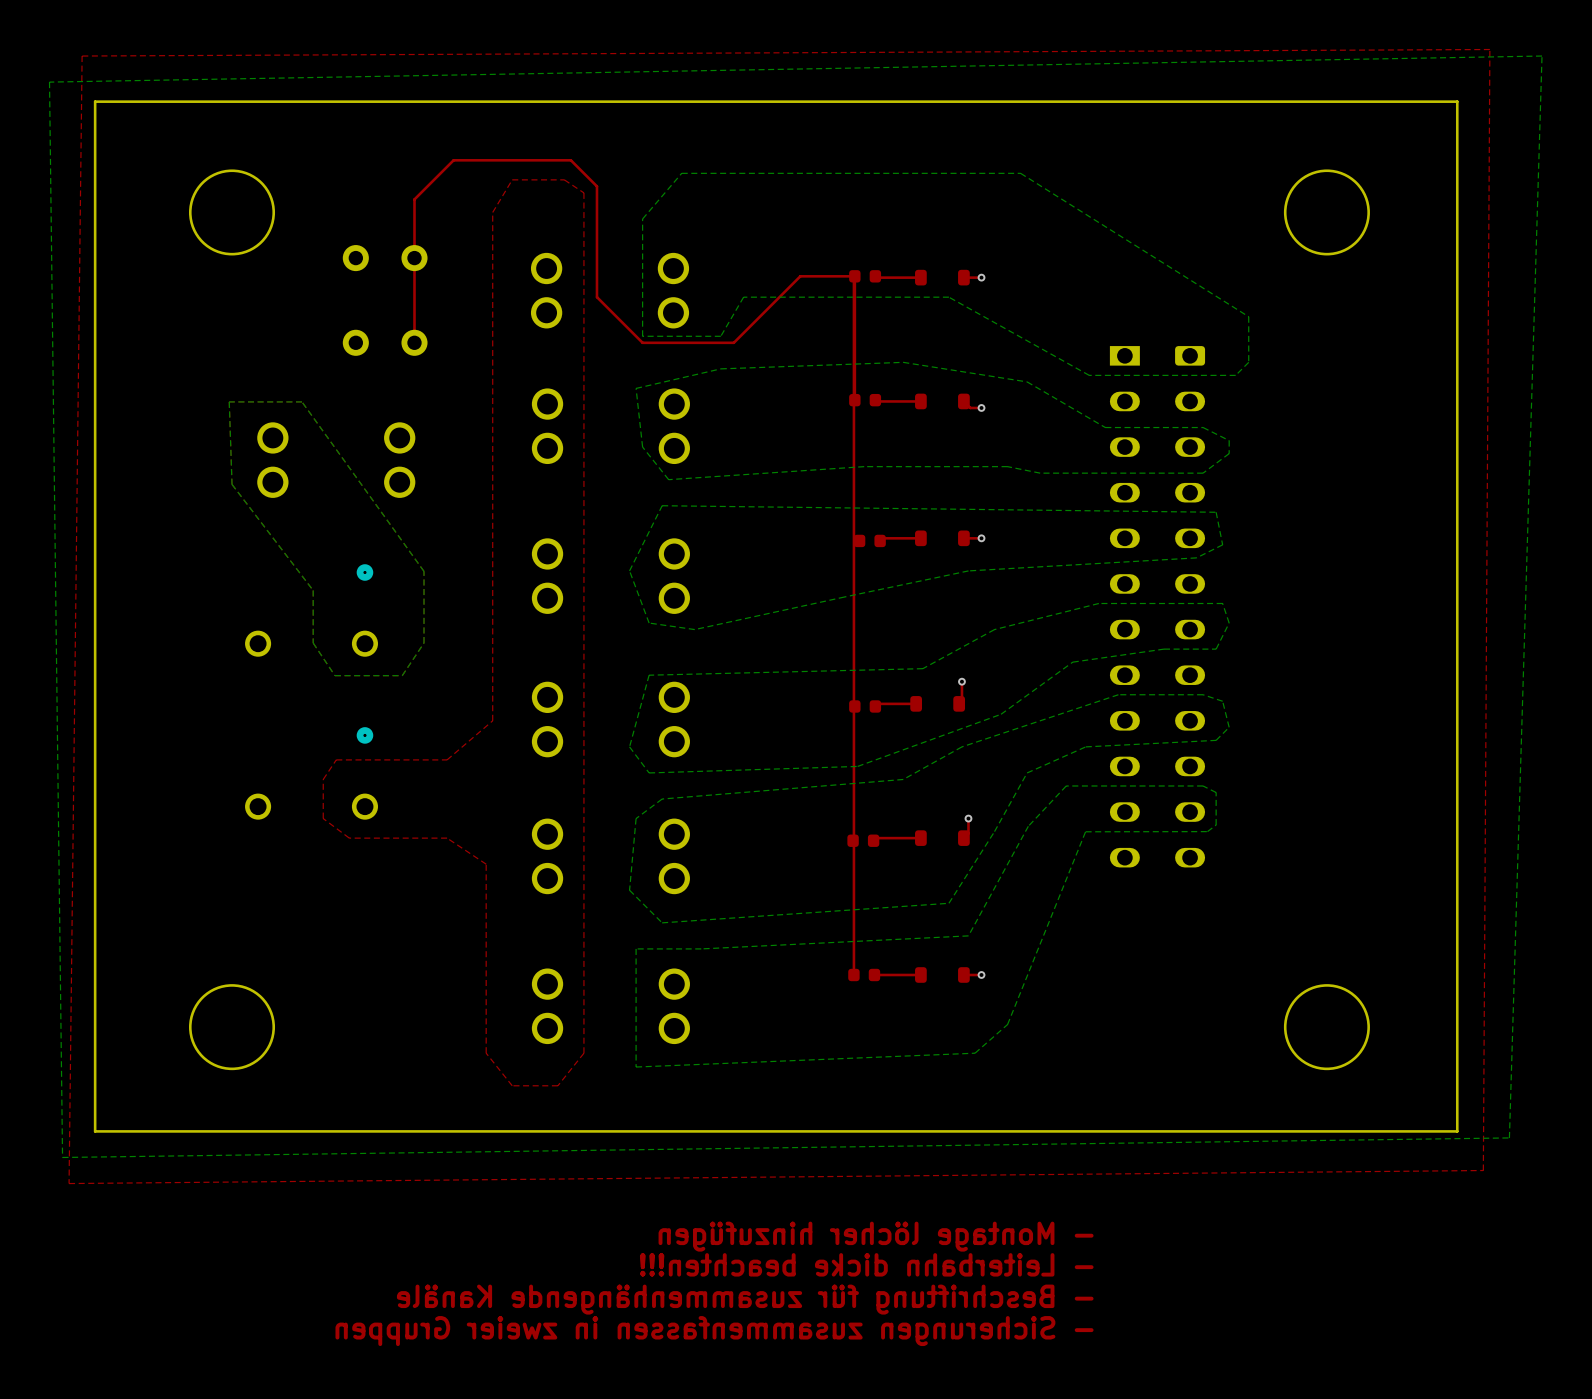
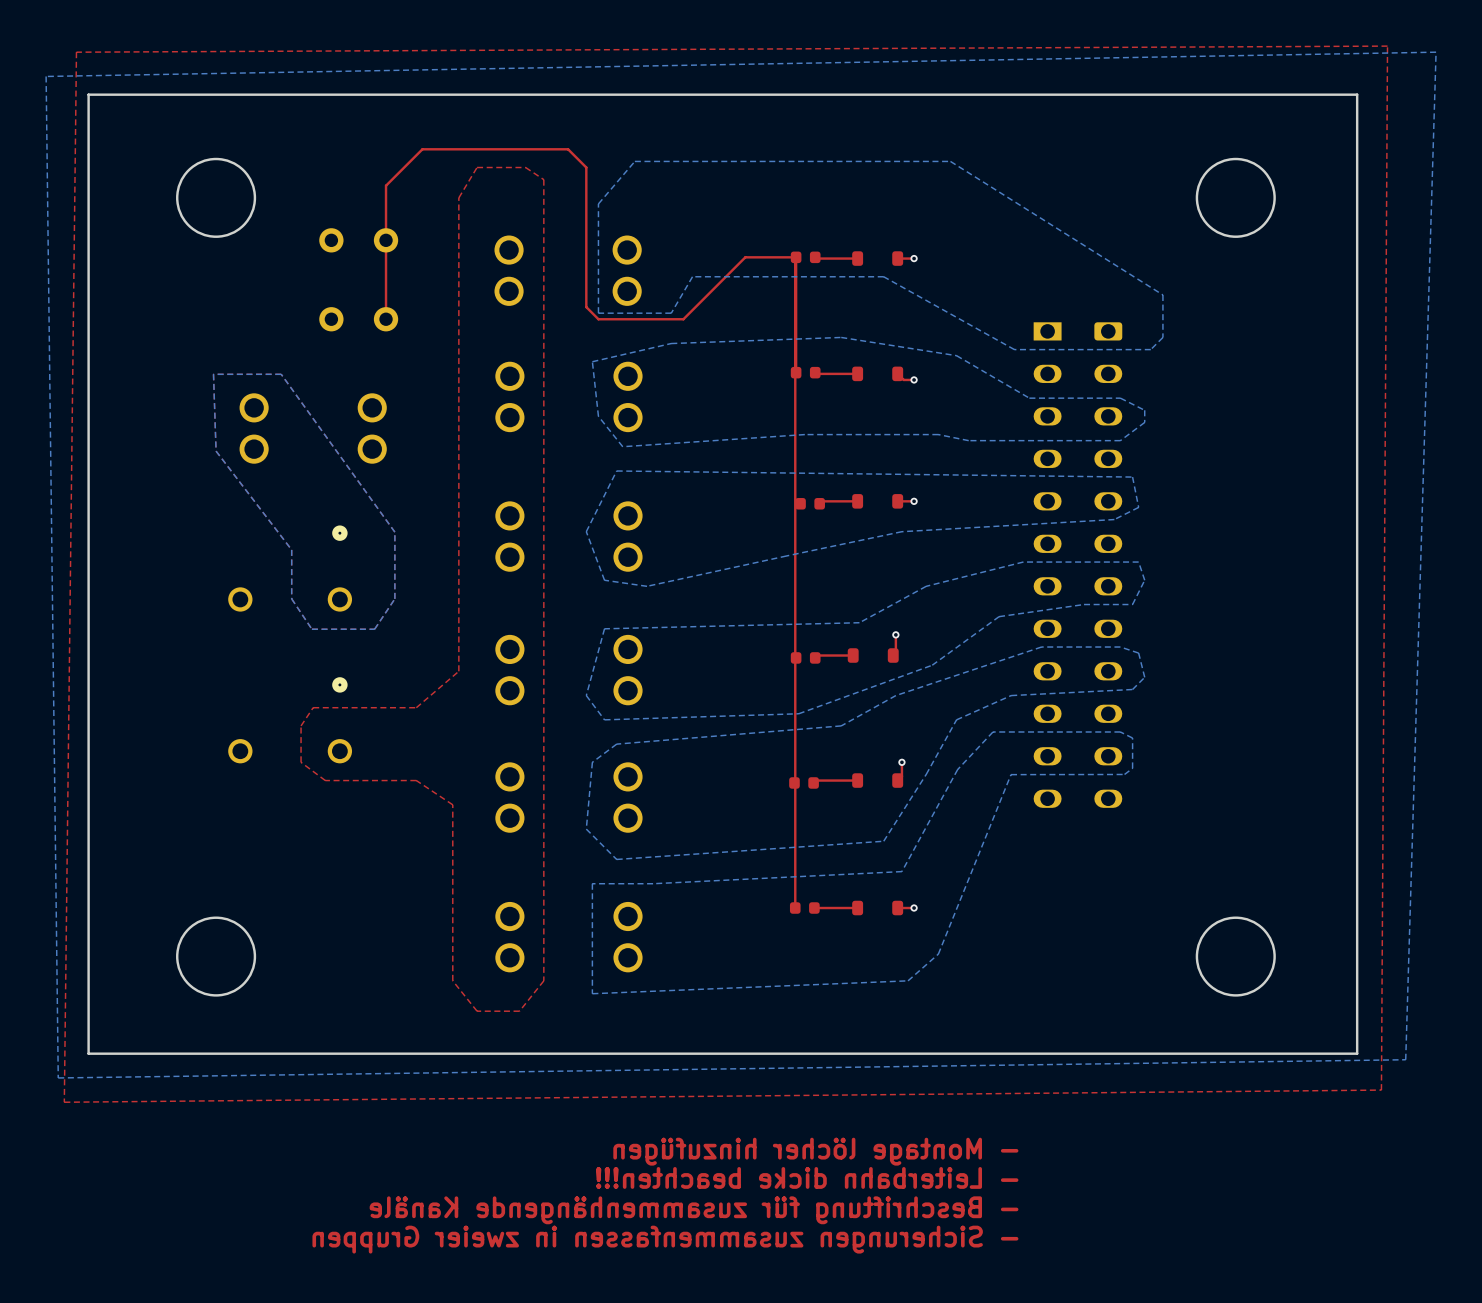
top track: (570, 160) (596, 186) (596, 297) (629, 329) -> (531, 149) (568, 149) (586, 167) (586, 307)

